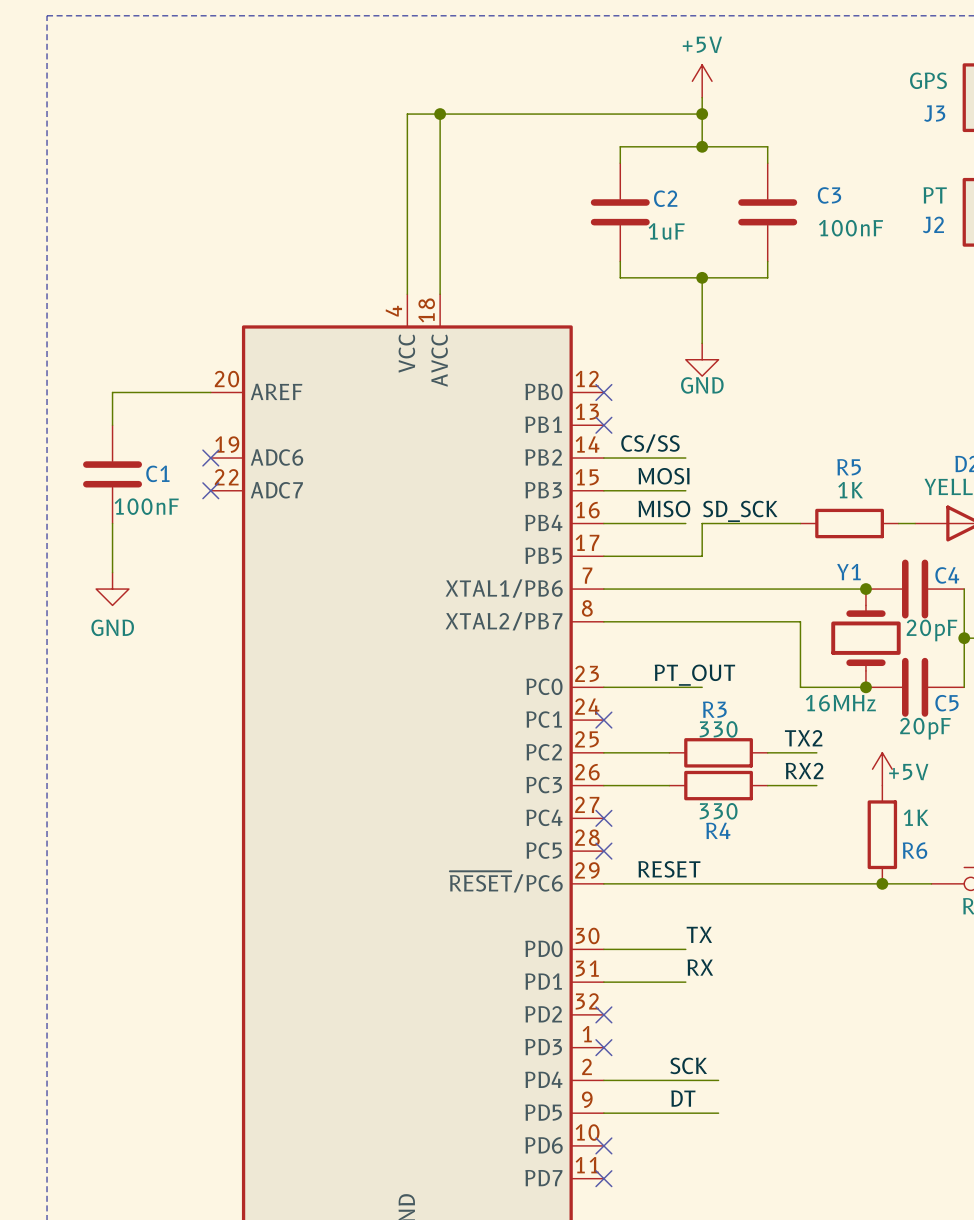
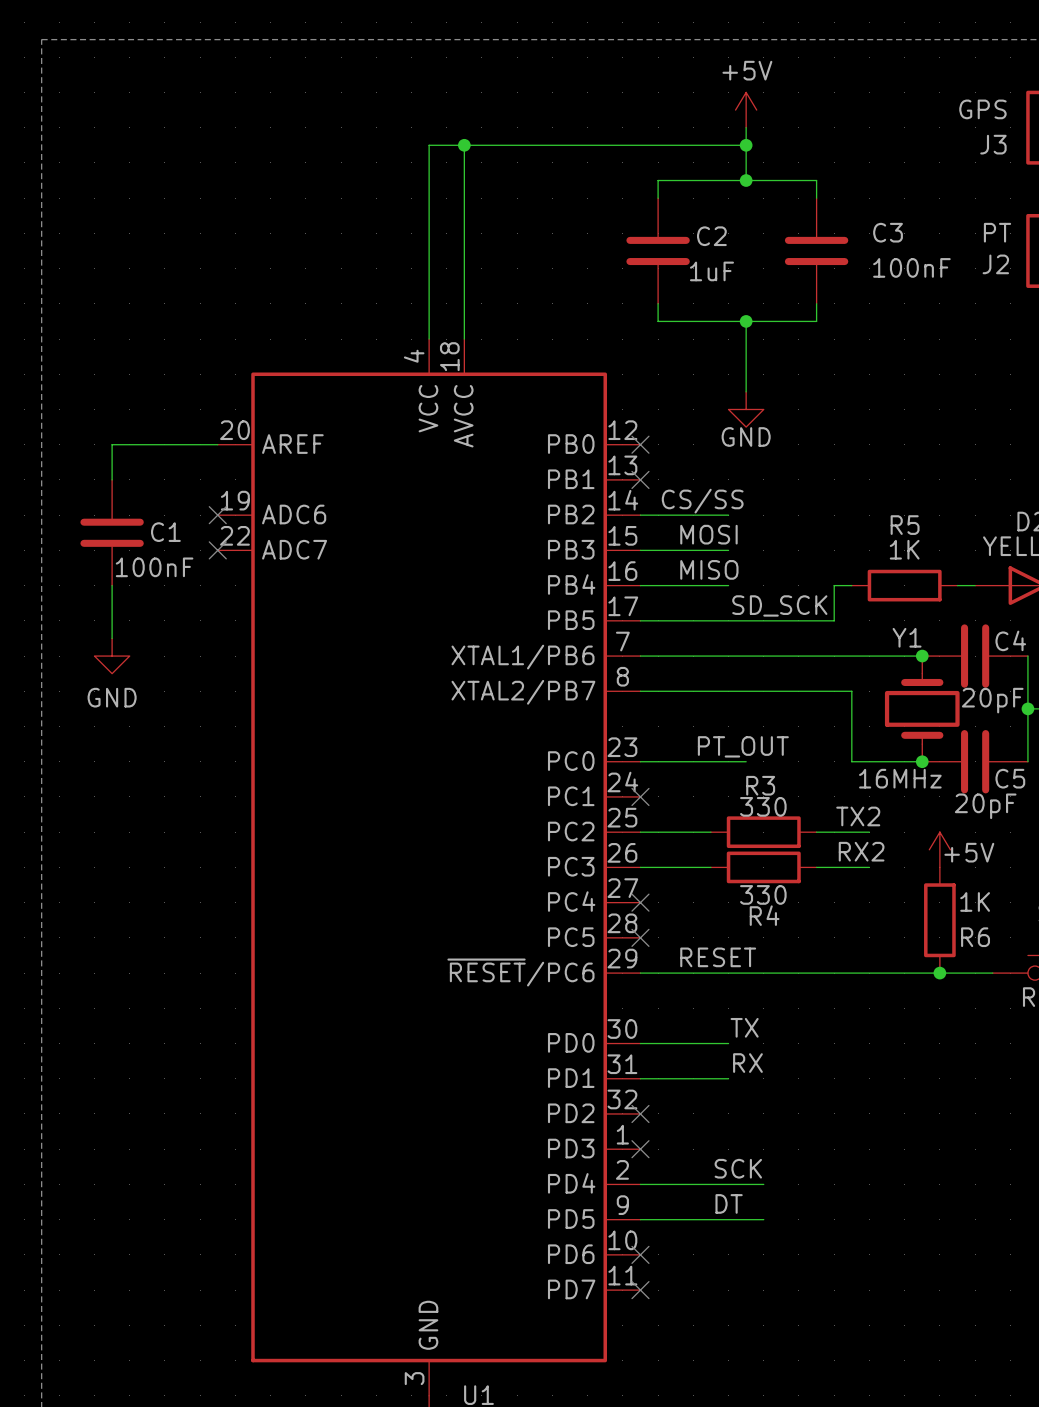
label position: SD_SCK (740, 511) -> SD_SCK (779, 605)
wire: (784, 523) (702, 523) (702, 556) -> (834, 585) (834, 620) (746, 620)

